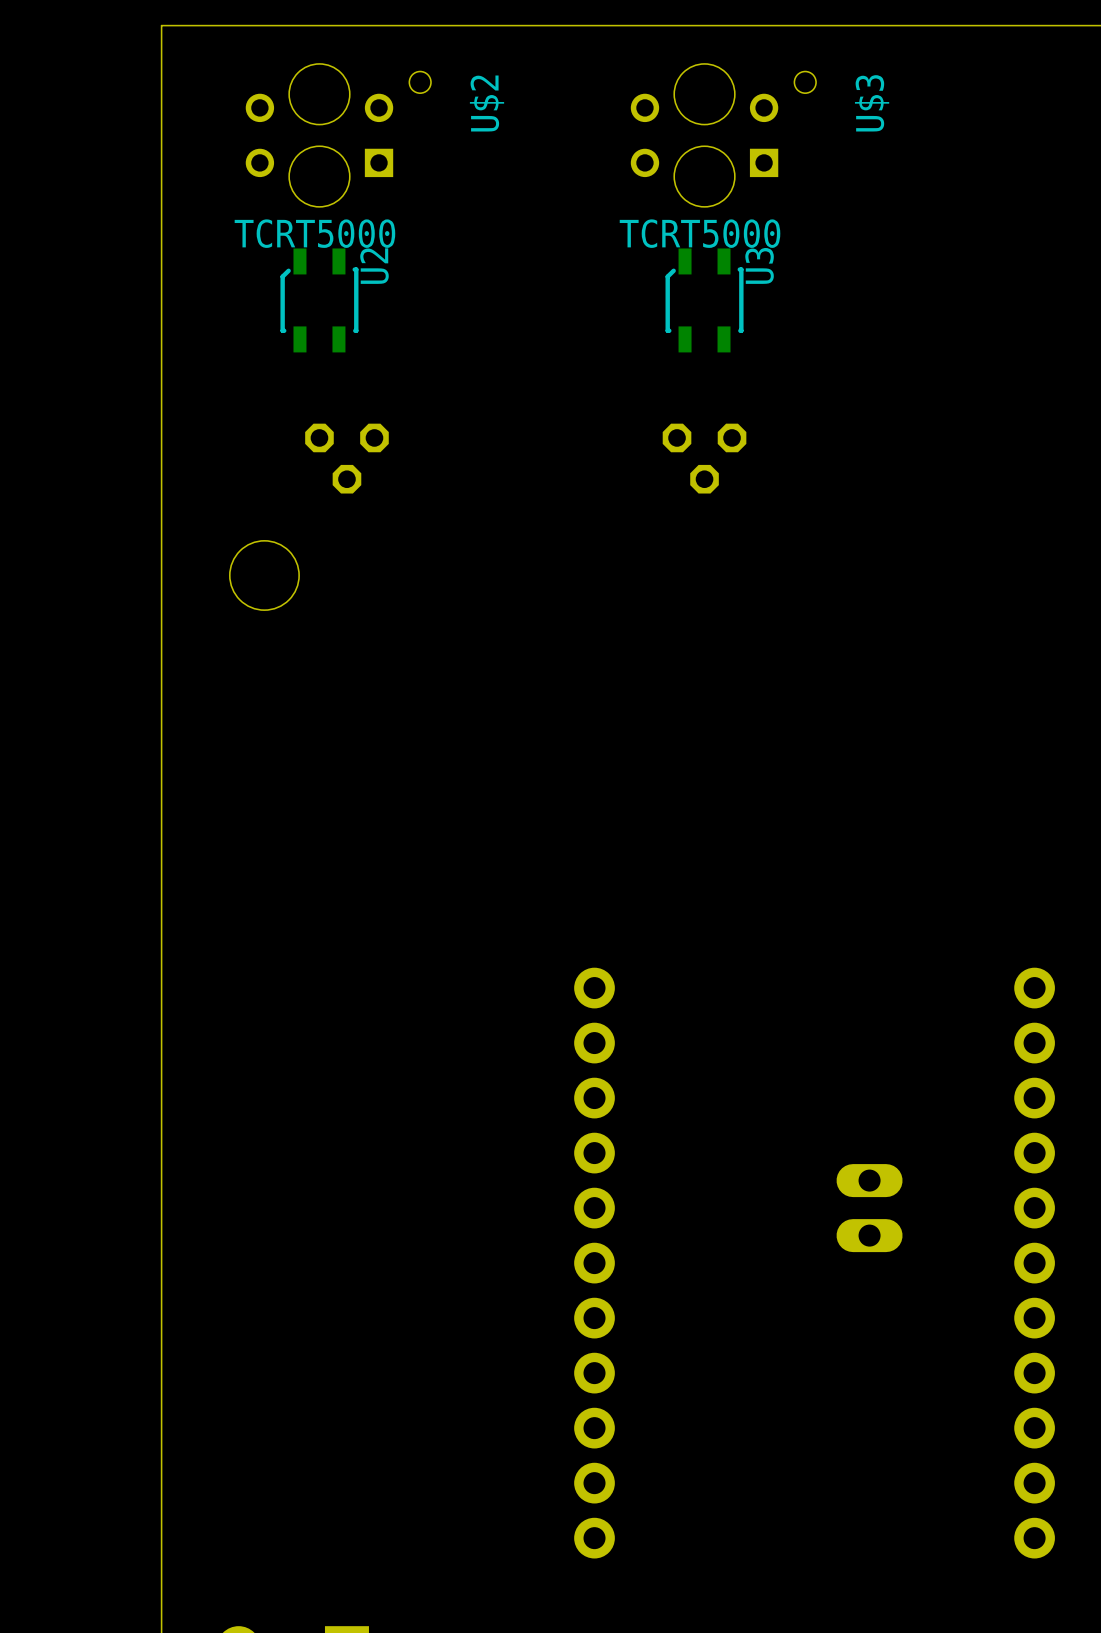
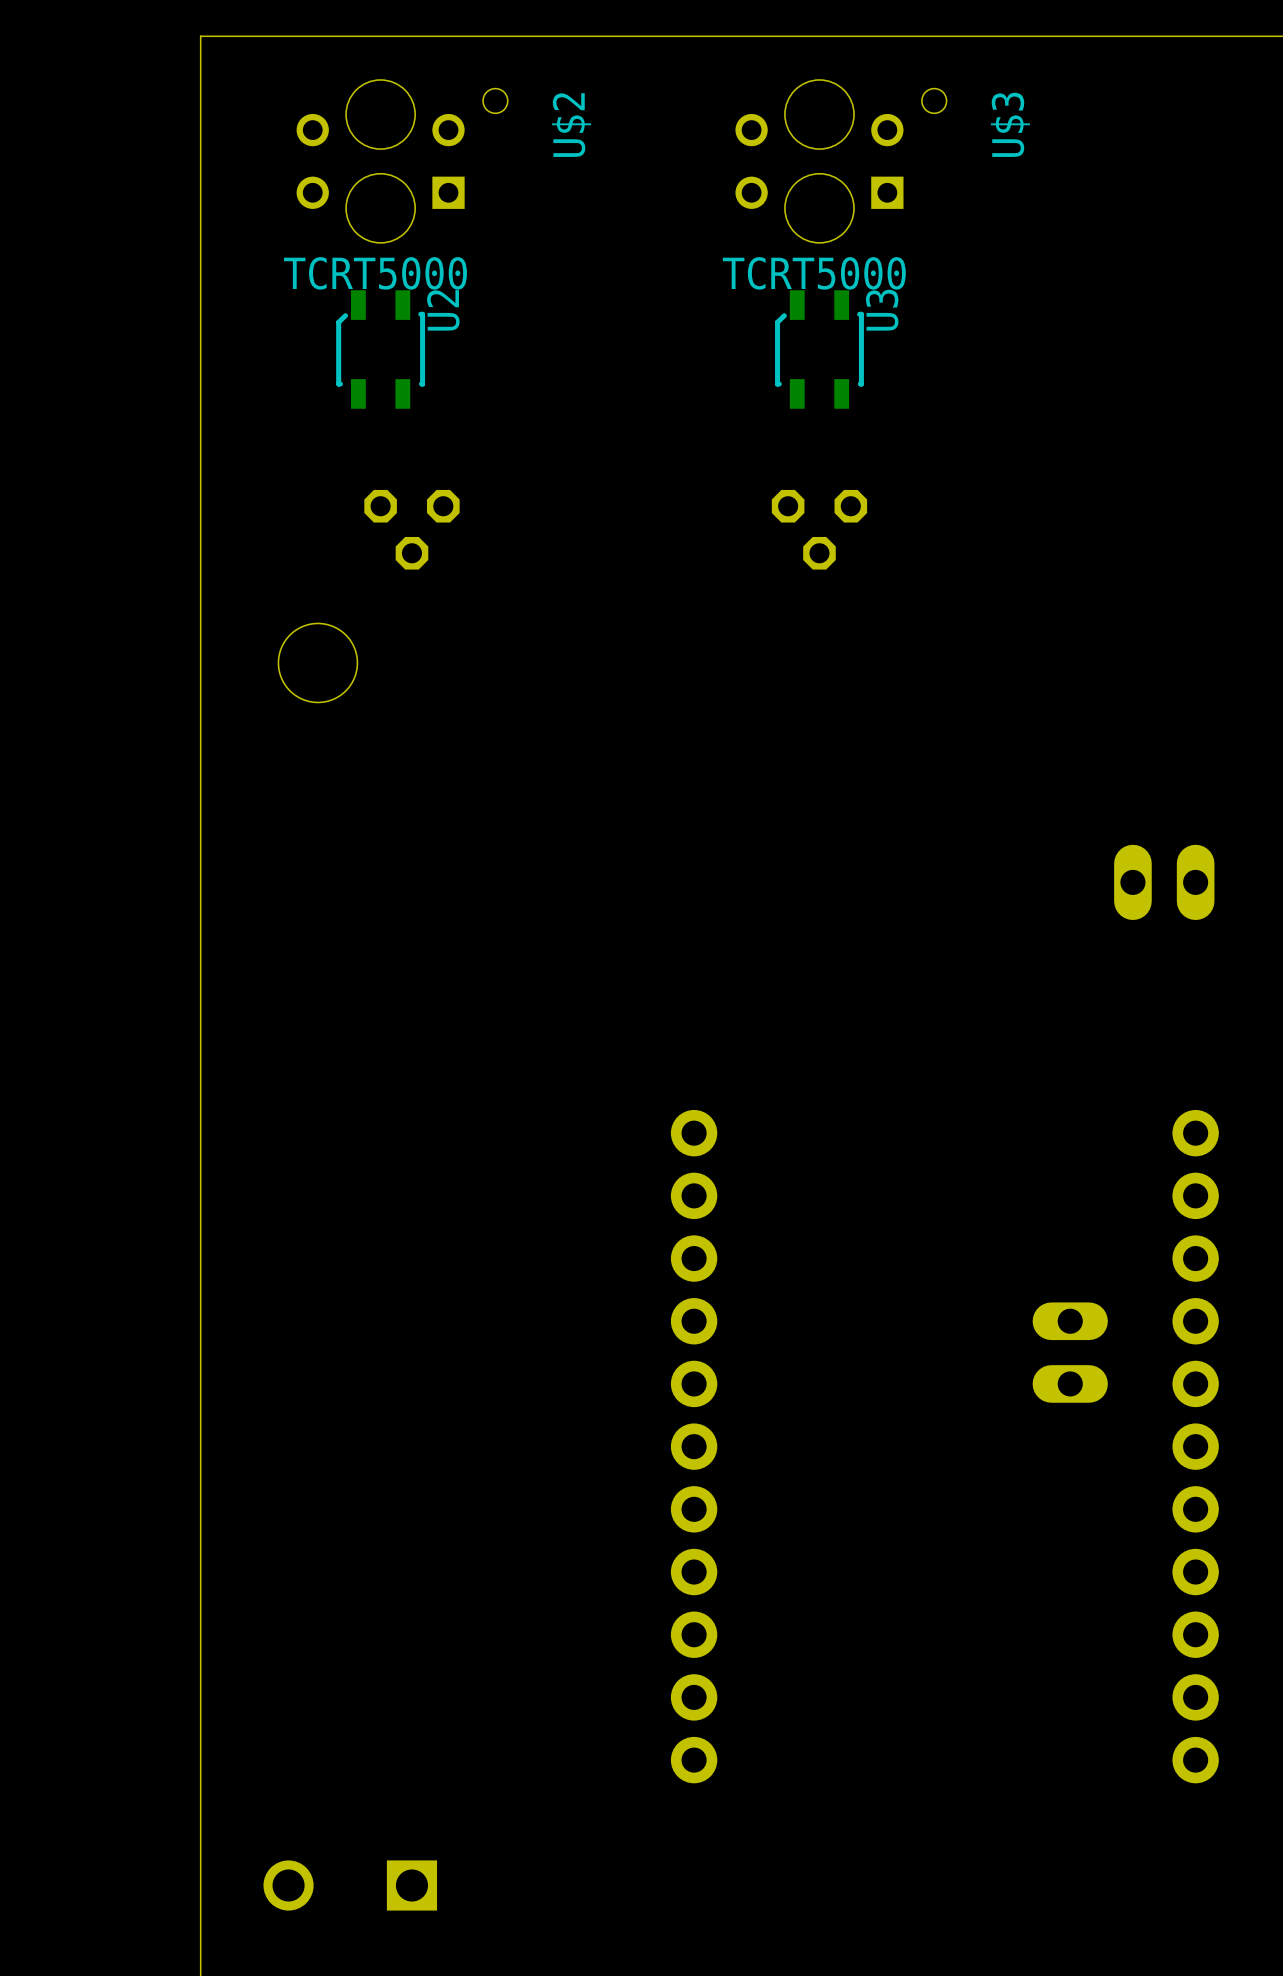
part: none -> (1164, 882)
part position: (869, 1208) -> (1070, 1352)

